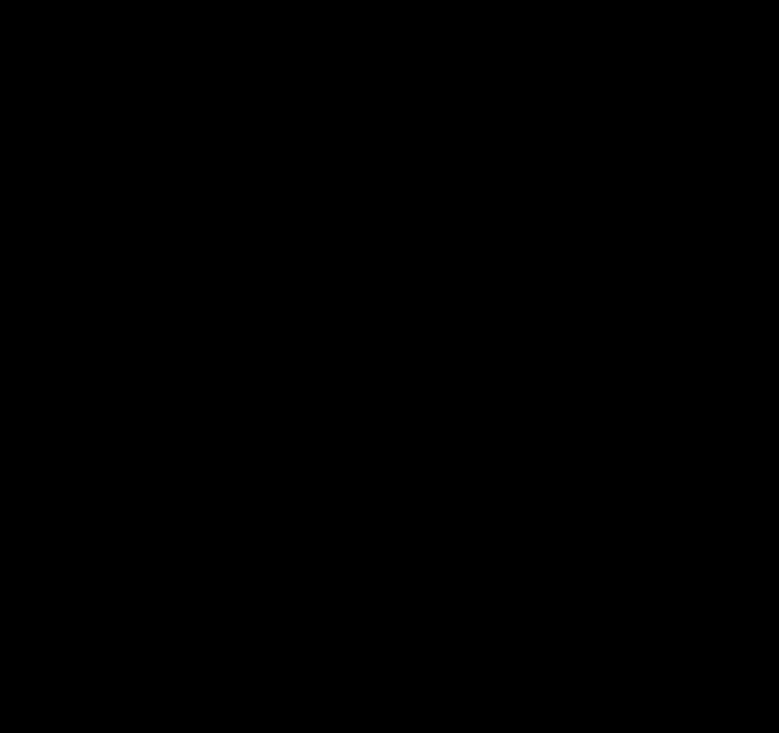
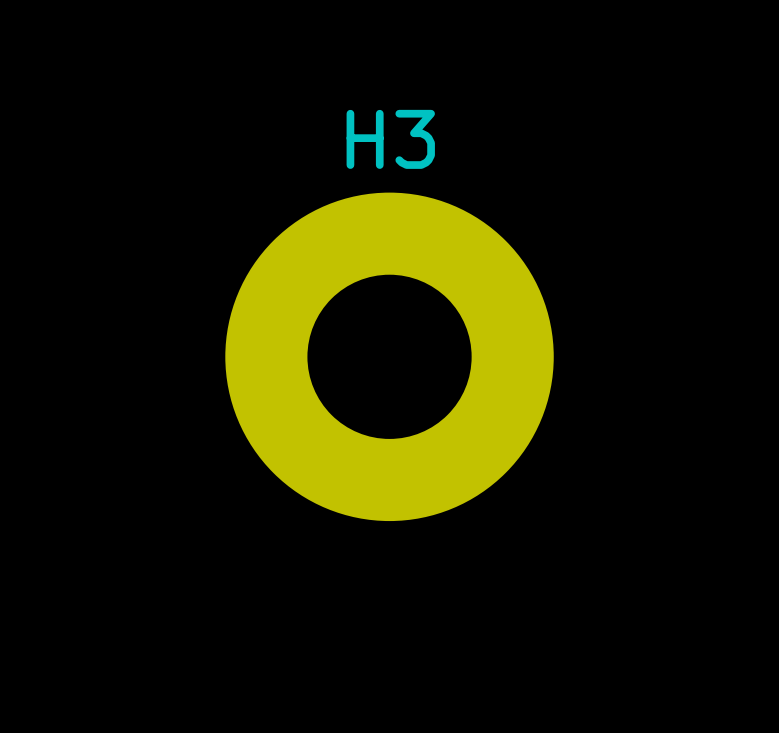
H3: none -> (389, 356)

